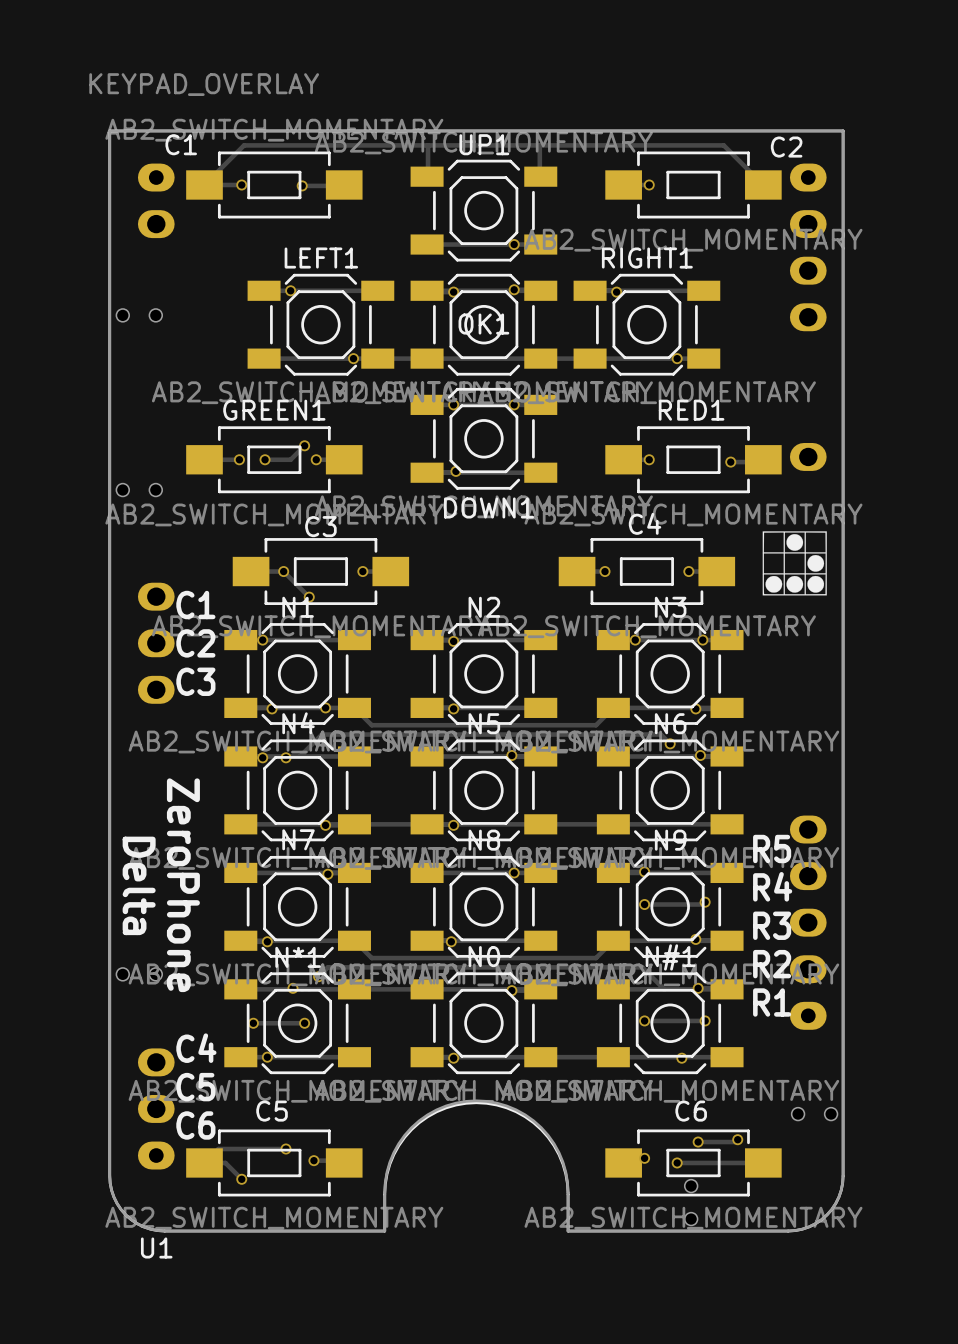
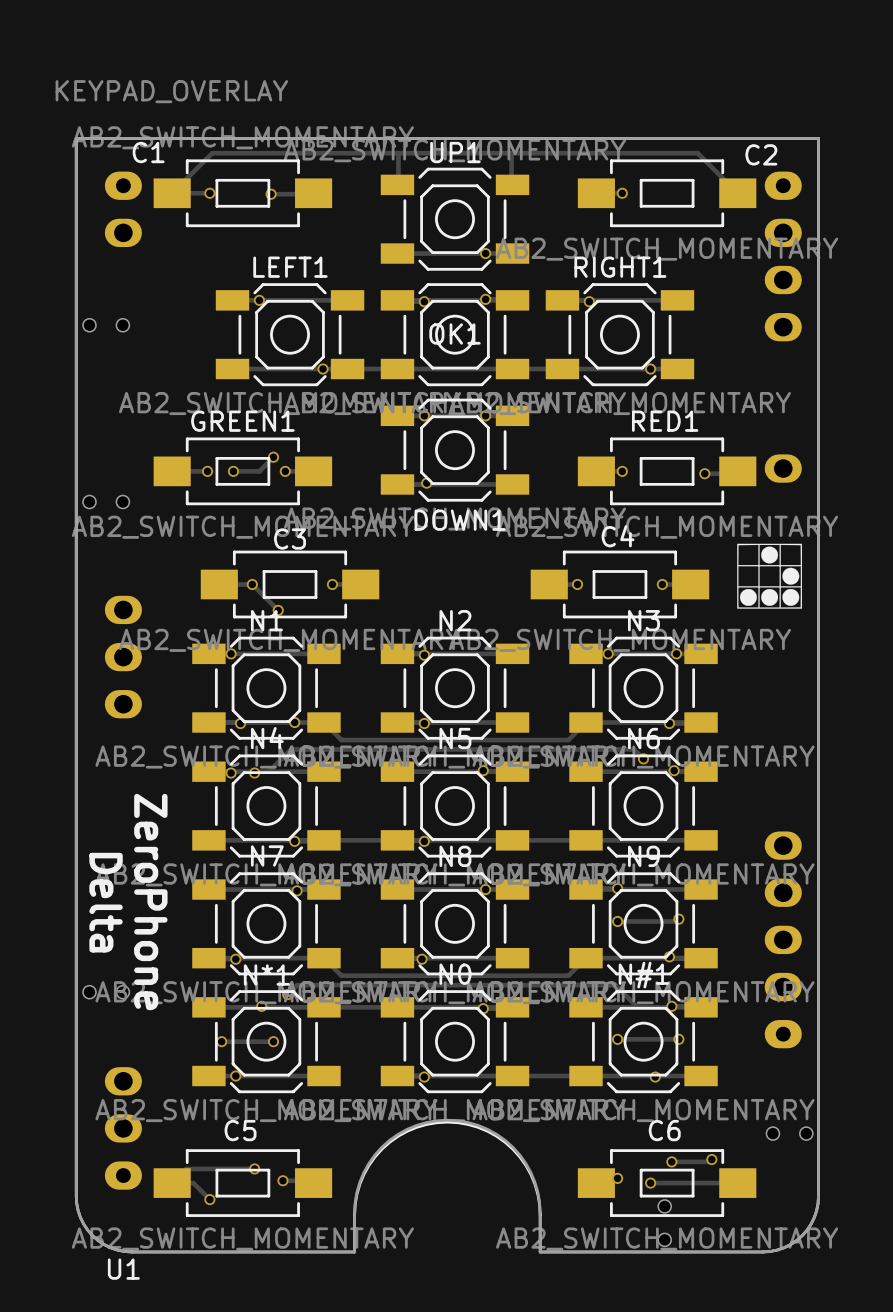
text: C1 (195, 605) -> none
text: C2 (195, 643) -> none
text: C3 (195, 681) -> none
text: R5 (772, 849) -> none
text: R4 (772, 886) -> none
text: R3 (772, 925) -> none
text: R2 (772, 964) -> none
text: R1 (772, 1002) -> none
text: C4 (196, 1048) -> none
text: C5 (195, 1087) -> none
text: C6 (195, 1125) -> none

